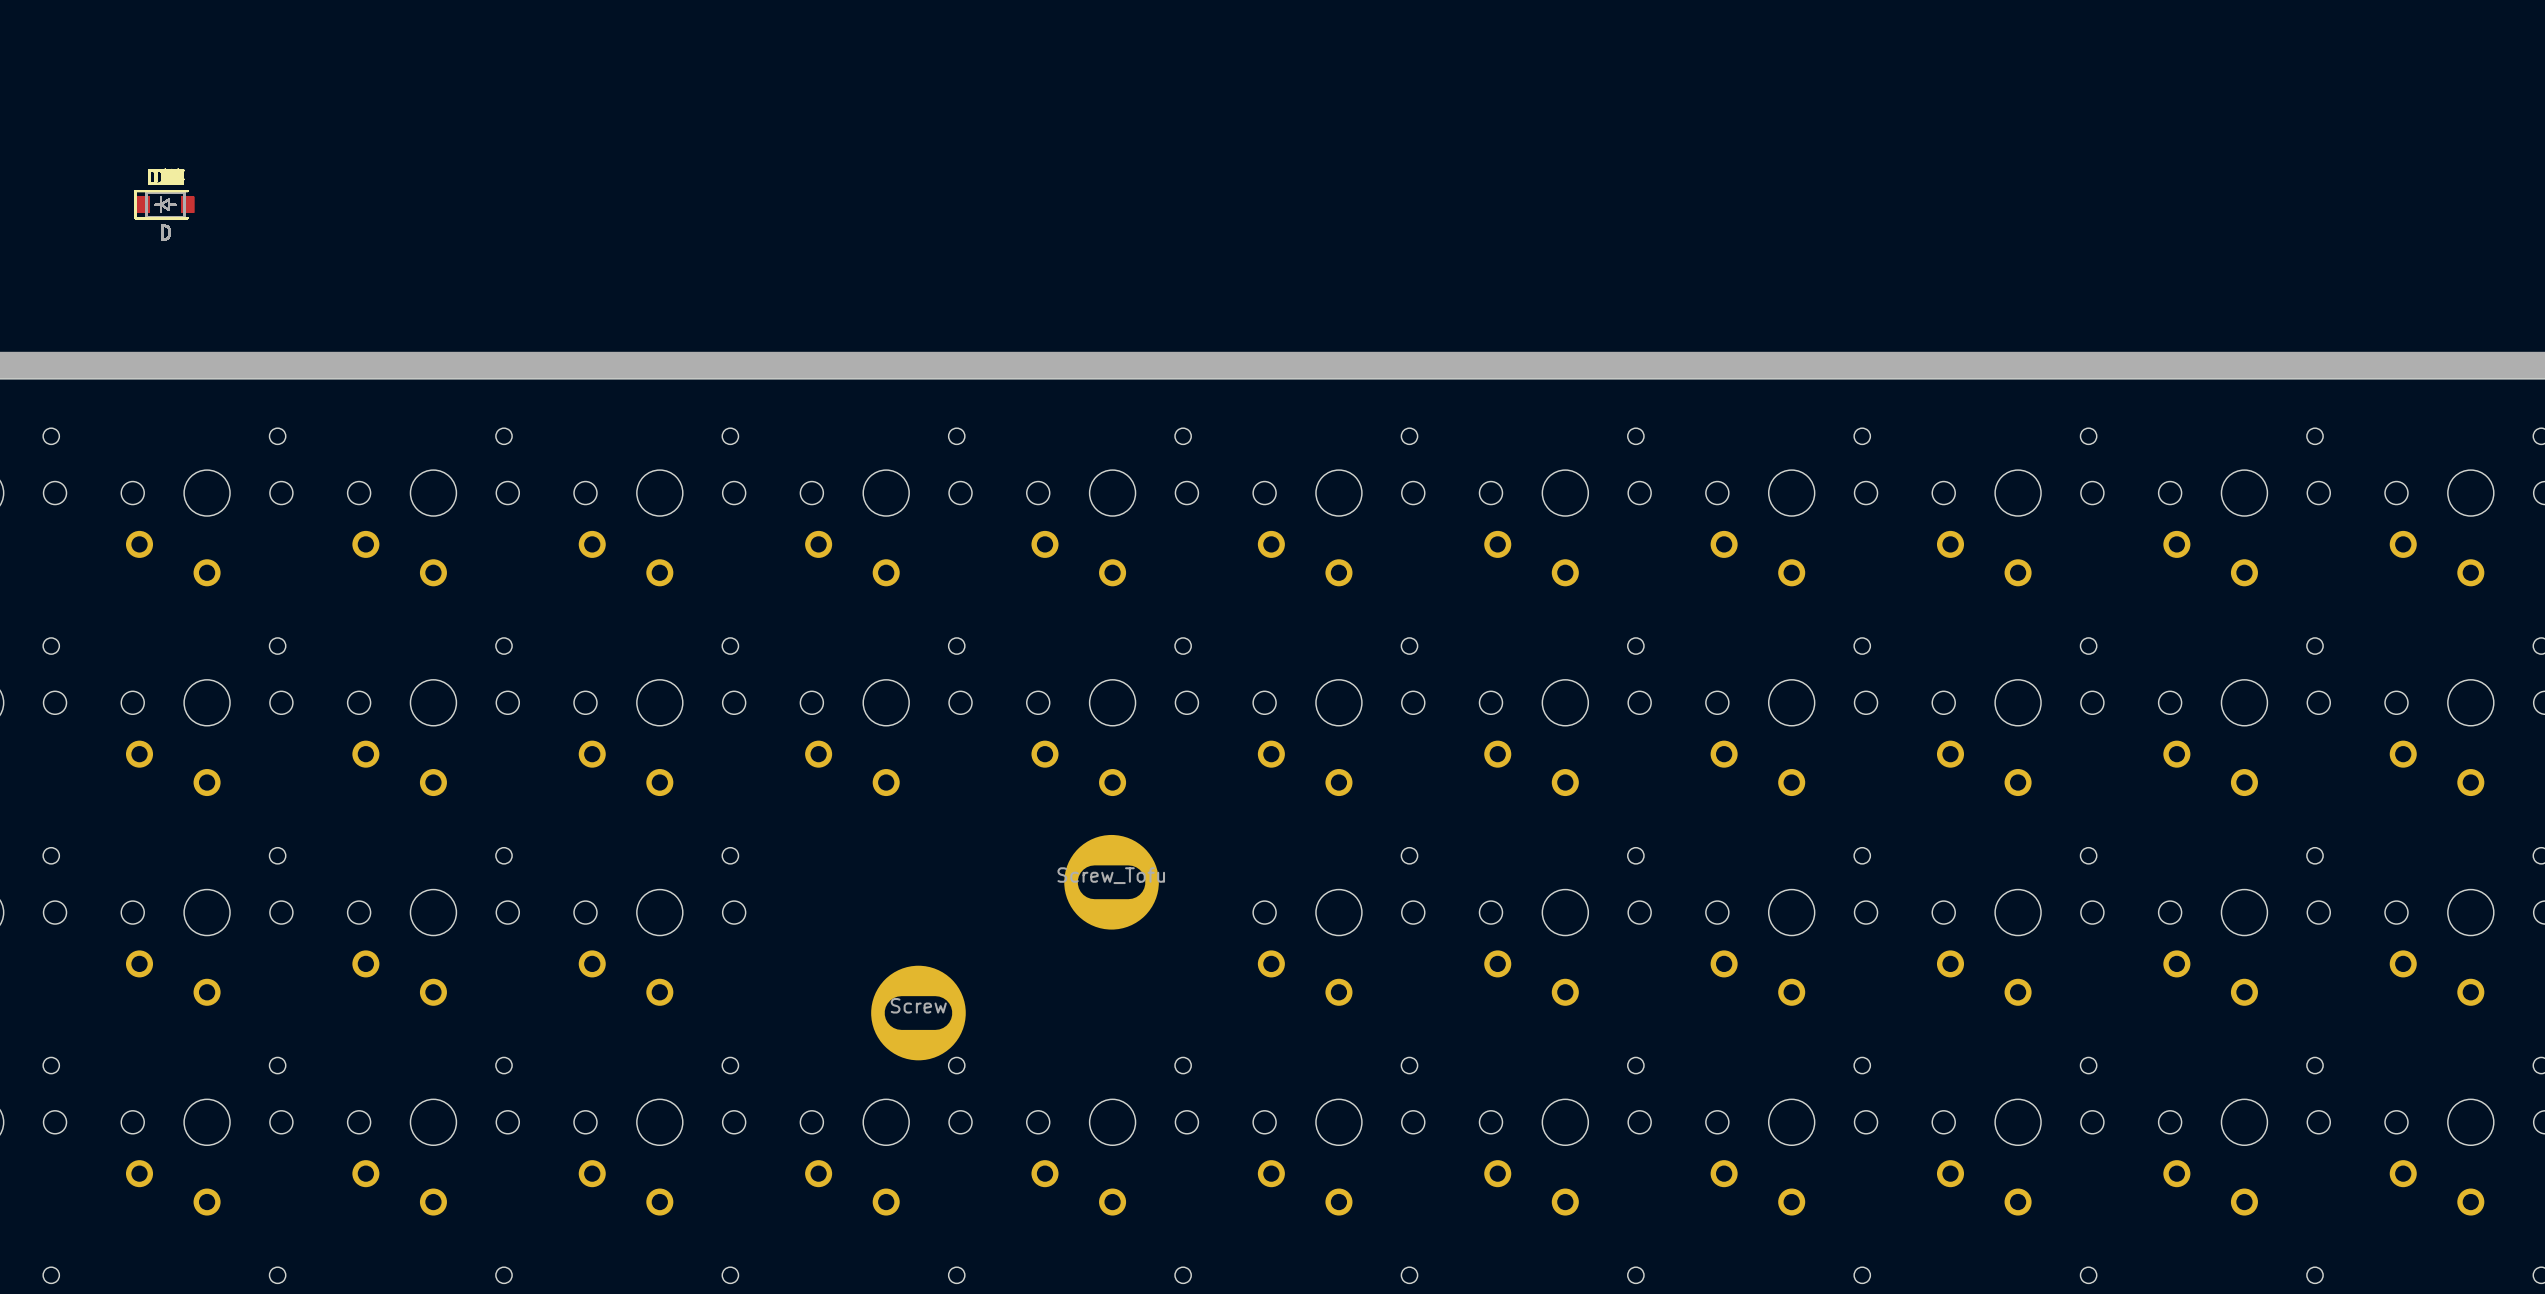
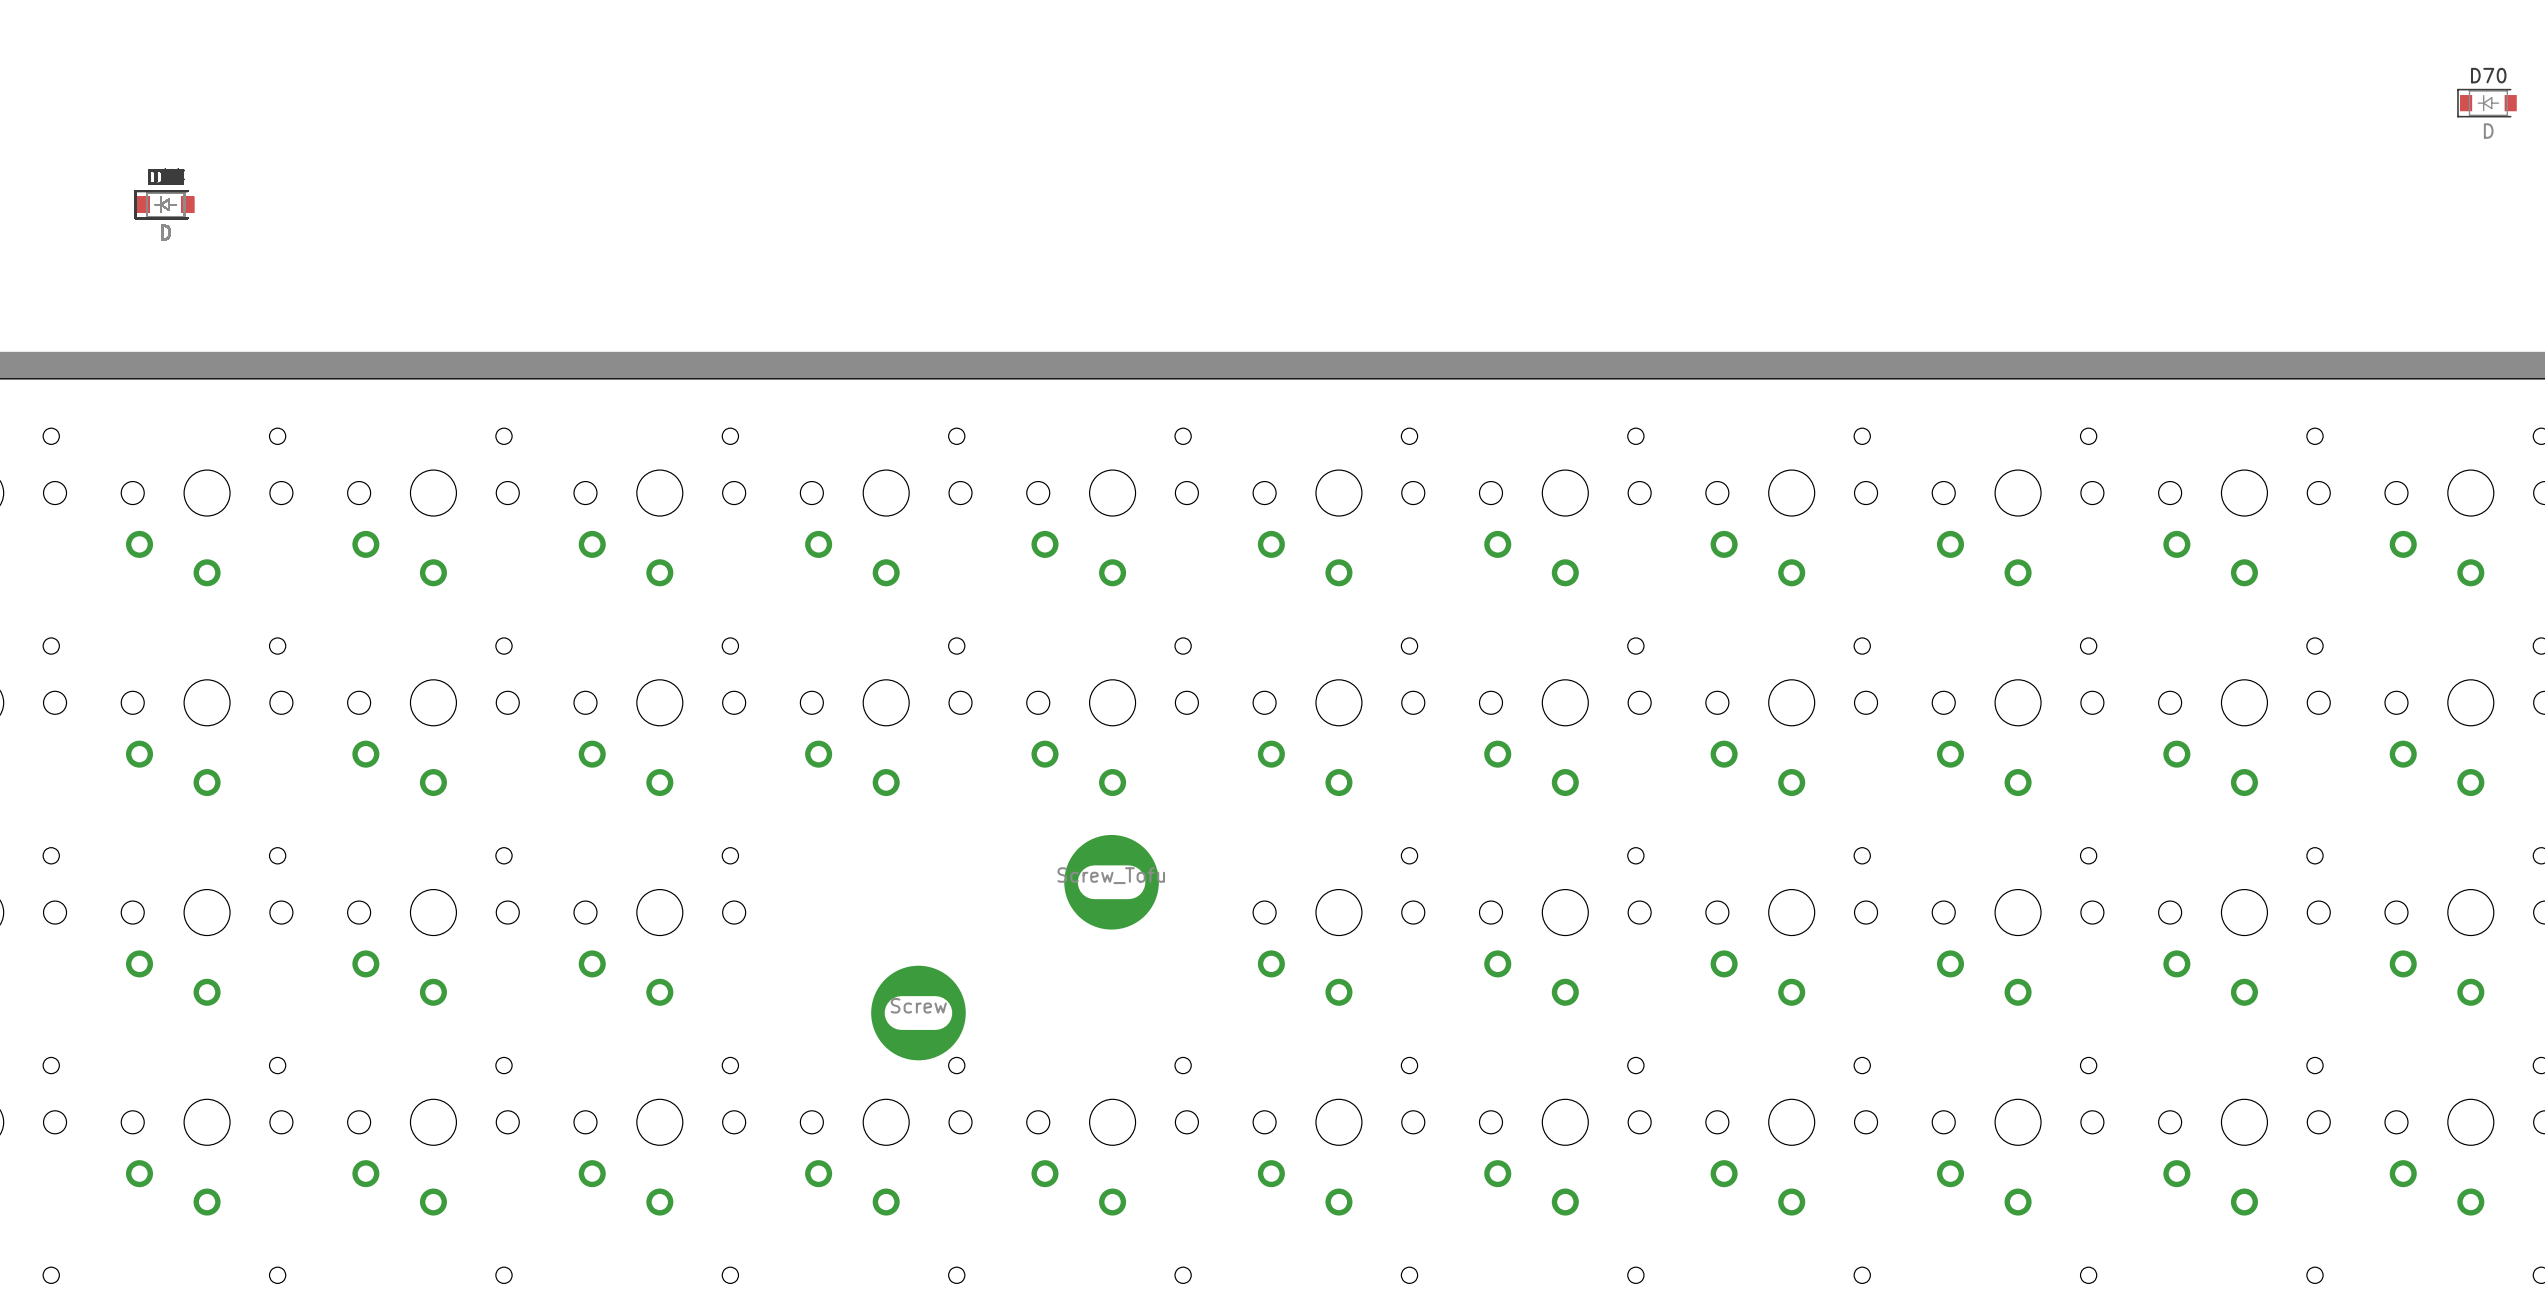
D70: none -> D (2486, 103)

